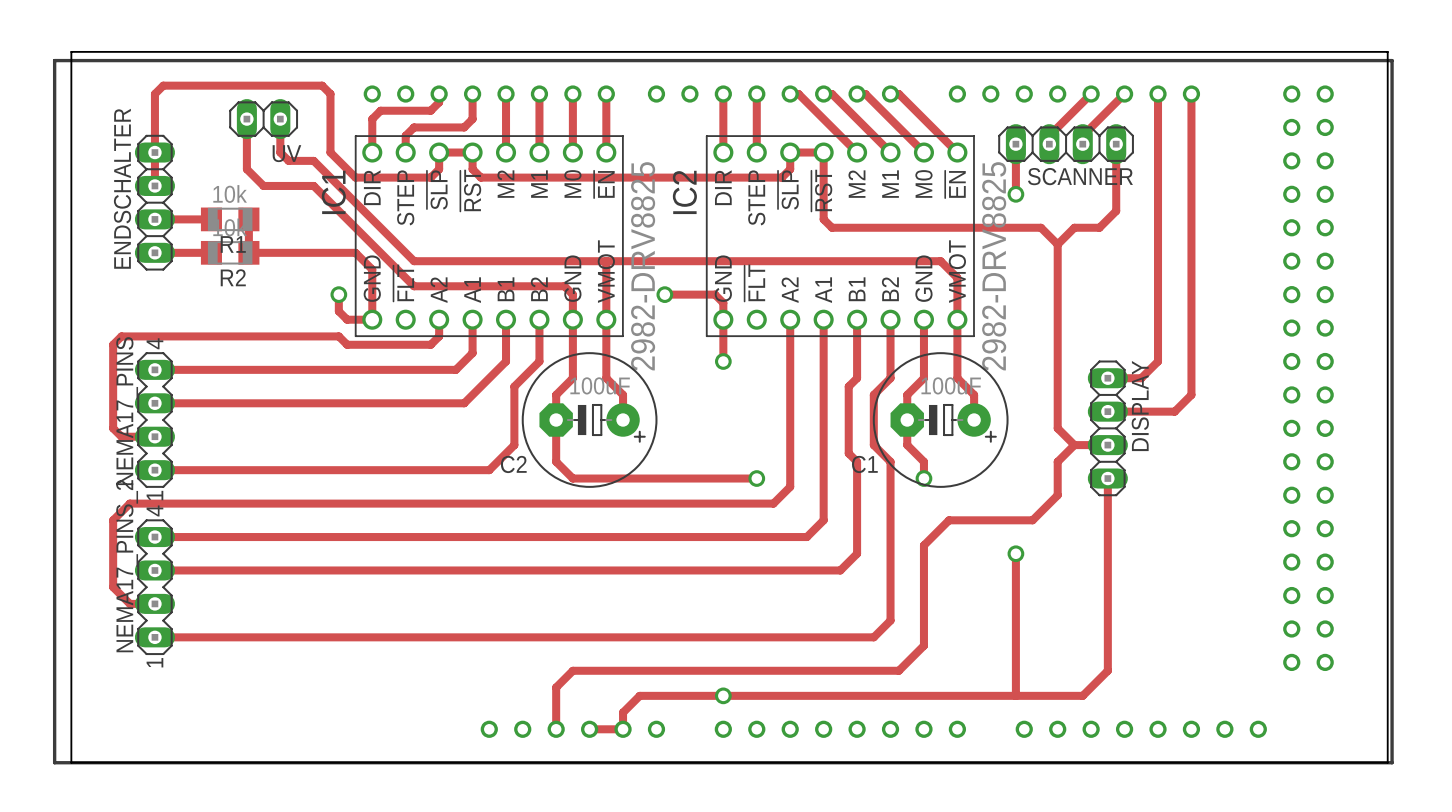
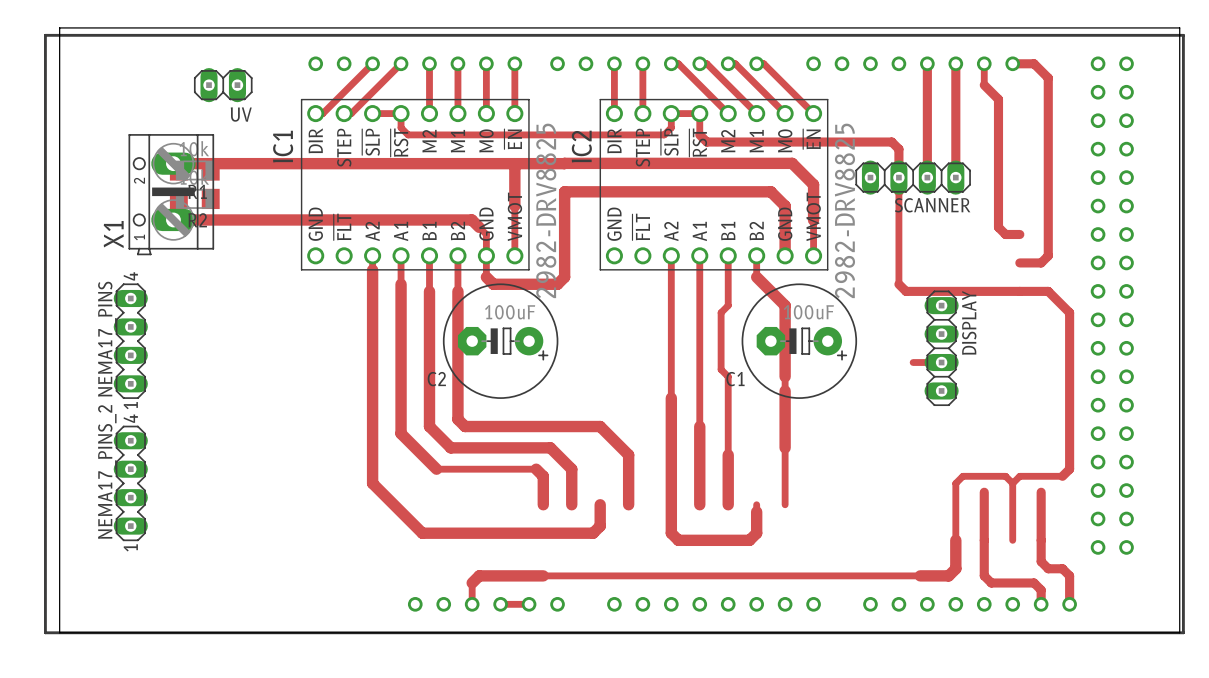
track: (439, 94) (439, 102) (430, 110) (380, 110) (372, 119) (372, 152) -> (372, 63) (322, 113) (315, 113)
track: (472, 94) (472, 119) (464, 127) (414, 127) (405, 135) (405, 152) -> (401, 63) (351, 113) (344, 113)
track: (1091, 94) (1049, 135) (1049, 144) -> (927, 63) (927, 177)
track: (1124, 94) (1082, 135) (1082, 144) -> (955, 63) (955, 177)
track: (1191, 94) (1191, 394) (1174, 411) (1107, 411) -> (1012, 63) (1034, 63) (1048, 78) (1048, 255) (1041, 262) (1019, 262)
track: (246, 119) (246, 169) (263, 185) (313, 185) (414, 286) (564, 286) -> (173, 219) (471, 219) (479, 227)
track: (280, 119) (280, 152) (288, 160) (313, 160) (414, 261) (940, 261) (957, 277) -> (173, 163) (792, 163) (813, 184) (813, 220)
track: (1158, 119) (1158, 361) (1141, 378) (1107, 378) -> (984, 85) (998, 99) (998, 227) (1005, 234) (1019, 234)
track: (1015, 144) (1015, 194) -> none
SCANNER position: (1066, 144) -> (913, 177)
track: (1116, 144) (1116, 211) (1099, 227) (1074, 227) (1057, 244) (1040, 227) (832, 227) (823, 219) (823, 177) -> (898, 191) (898, 149) (891, 142) (706, 142) (699, 134)
track: (439, 152) (439, 169) (430, 177) (355, 177) (330, 152) (330, 94) (322, 85) (163, 85) (154, 94) (154, 185) -> none
via: (1015, 194) -> none
ENDSCHALTER: (154, 202) -> none
track: none -> (514, 163) (514, 206)
track: (154, 219) (211, 219) -> none
track: (248, 219) (248, 252) (355, 252) (372, 269) (372, 319) (347, 319) (338, 311) (338, 294) -> none
X1: none -> (171, 194)
track: (154, 252) (211, 252) -> none
via: (338, 294) -> none
track: (664, 294) (714, 294) (723, 302) (723, 361) -> none
via: (664, 294) -> none
track: (606, 319) (606, 378) (623, 394) (623, 420) -> none
track: (923, 319) (923, 378) (907, 394) (907, 445) (923, 461) -> (756, 277) (785, 305) (785, 376)
track: (957, 319) (957, 378) (974, 394) (974, 420) -> none
track: (439, 336) (430, 344) (347, 344) (338, 336) (121, 336) (113, 344) (113, 428) (121, 436) (154, 436) -> (372, 270) (372, 483) (422, 533) (593, 533) (600, 526) (600, 504)
track: (572, 344) (572, 378) (556, 394) (556, 461) (572, 478) (756, 478) -> (486, 277) (493, 284) (557, 284) (564, 277) (564, 191) (770, 191) (785, 206) (785, 255)
track: (890, 344) (890, 378) (873, 394) (873, 445) (890, 461) (890, 612) -> none
track: (472, 353) (455, 369) (154, 369) -> none
track: (1057, 353) (1057, 428) (1074, 445) (1057, 461) (1057, 495) (1032, 520) (949, 520) (923, 545) -> (785, 390) (785, 447)
track: none -> (898, 284) (906, 291) (1048, 291) (1069, 312) (1069, 469) (1062, 476) (1019, 476) (1012, 483)
track: (506, 361) (464, 403) (154, 403) -> (429, 291) (429, 426) (450, 447) (550, 447) (571, 469) (571, 504)
track: (539, 361) (514, 386) (514, 445) (489, 470) (154, 470) -> (457, 291) (457, 419) (465, 426) (600, 426) (628, 454) (628, 504)
via: (723, 361) -> none
via: (756, 478) -> none
via: (923, 478) -> none
track: (1107, 478) (1107, 670) (1082, 695) -> (1012, 483) (1005, 476) (962, 476) (955, 483) (955, 568) (948, 575) (920, 575)
track: (790, 486) (773, 503) (129, 503) (113, 520) (113, 587) (129, 603) (154, 603) -> none
track: (823, 520) (806, 537) (154, 537) -> (699, 426) (699, 504)
track: (857, 553) (840, 570) (631, 570) -> (543, 504) (543, 476) (536, 469)
track: none -> (728, 454) (728, 504)
track: (1015, 553) (1015, 695) -> none
via: (1015, 553) -> none
track: (154, 570) (514, 570) -> (401, 284) (401, 433) (436, 469)
track: none -> (1012, 483) (1012, 540)
track: none -> (984, 492) (984, 575) (991, 583) (1034, 583) (1041, 590) (1041, 604)
track: none -> (1041, 492) (1041, 561) (1048, 568) (1062, 568) (1069, 575) (1069, 604)
track: (923, 612) (923, 645) (898, 670) (572, 670) (556, 687) (556, 704) -> none
track: (890, 620) (873, 637) (154, 637) -> (756, 511) (756, 533) (749, 540) (678, 540) (671, 533) (671, 398)
track: (639, 695) (623, 712) (623, 729) -> (543, 575) (479, 575) (472, 583)
via: (723, 695) -> none

